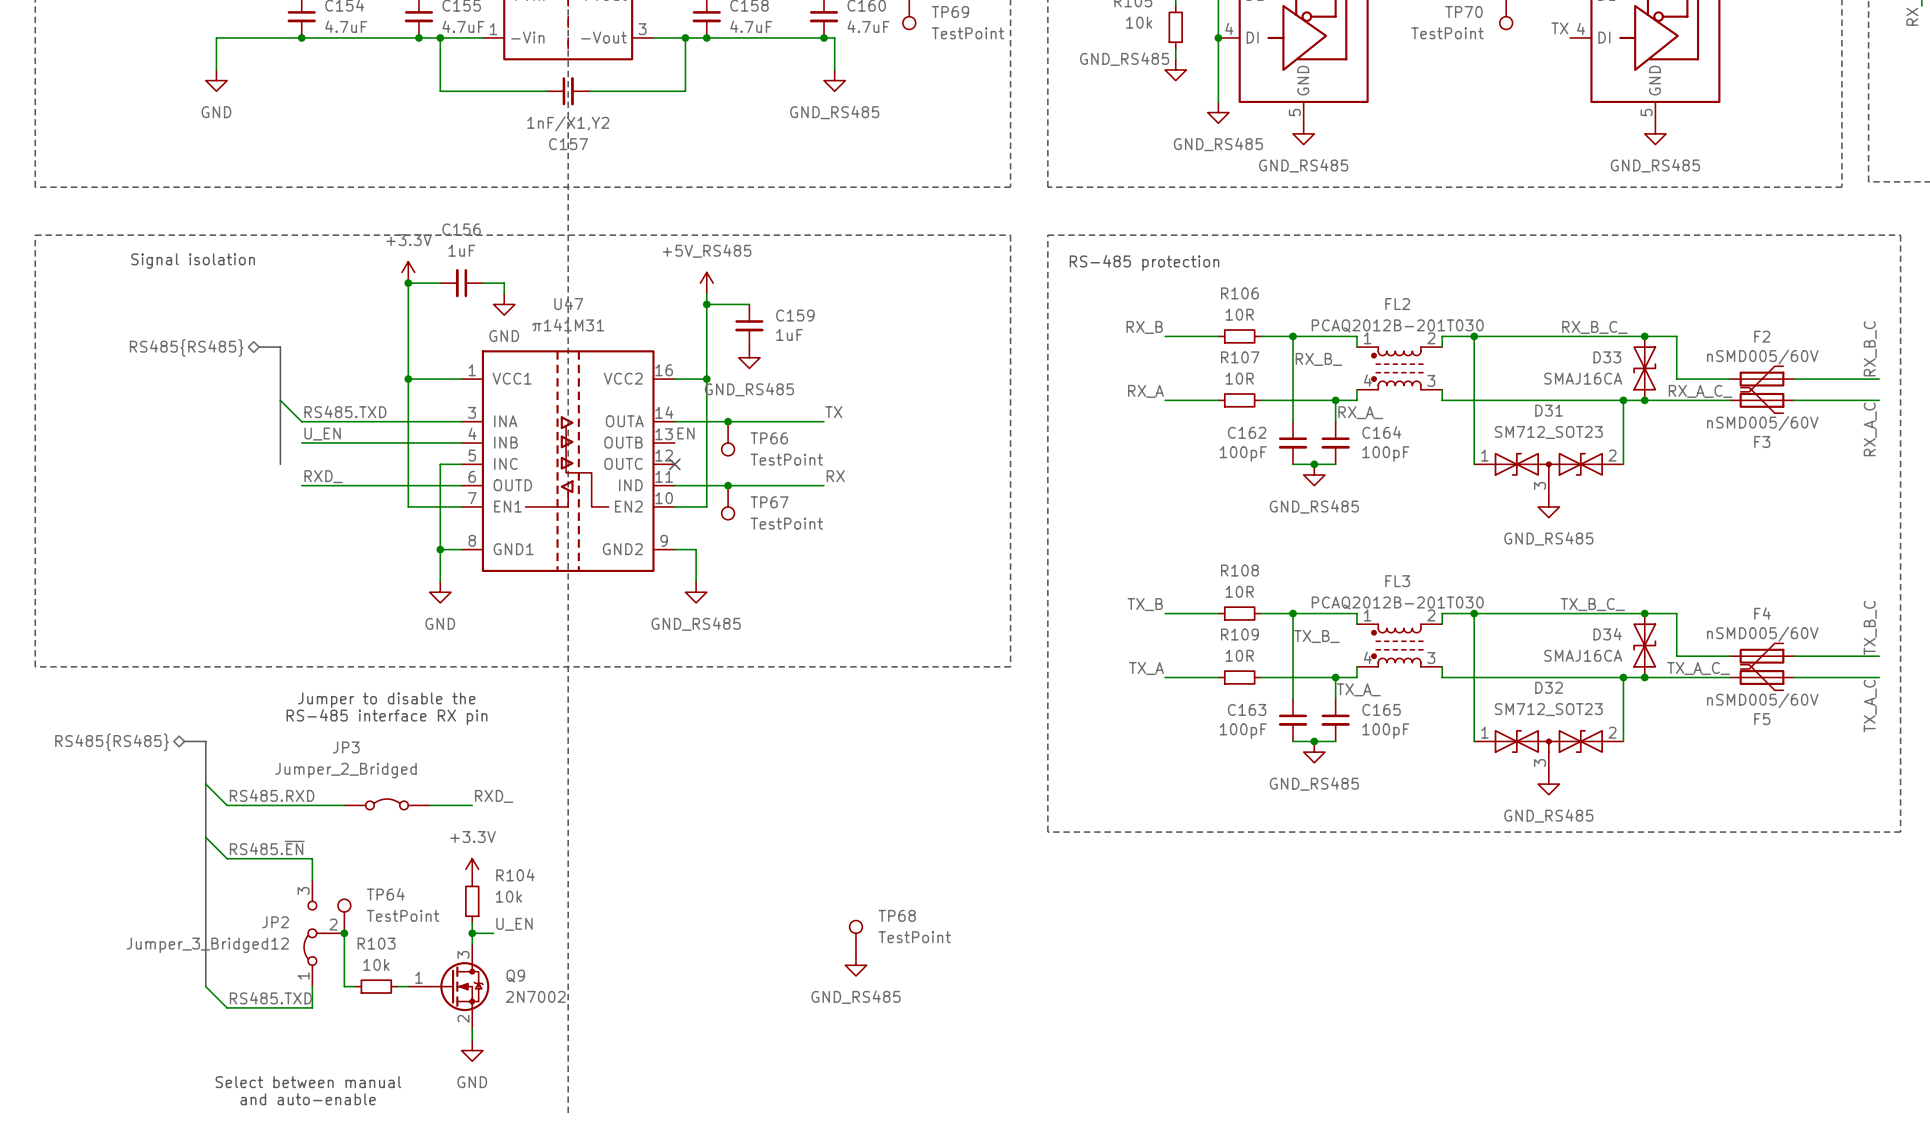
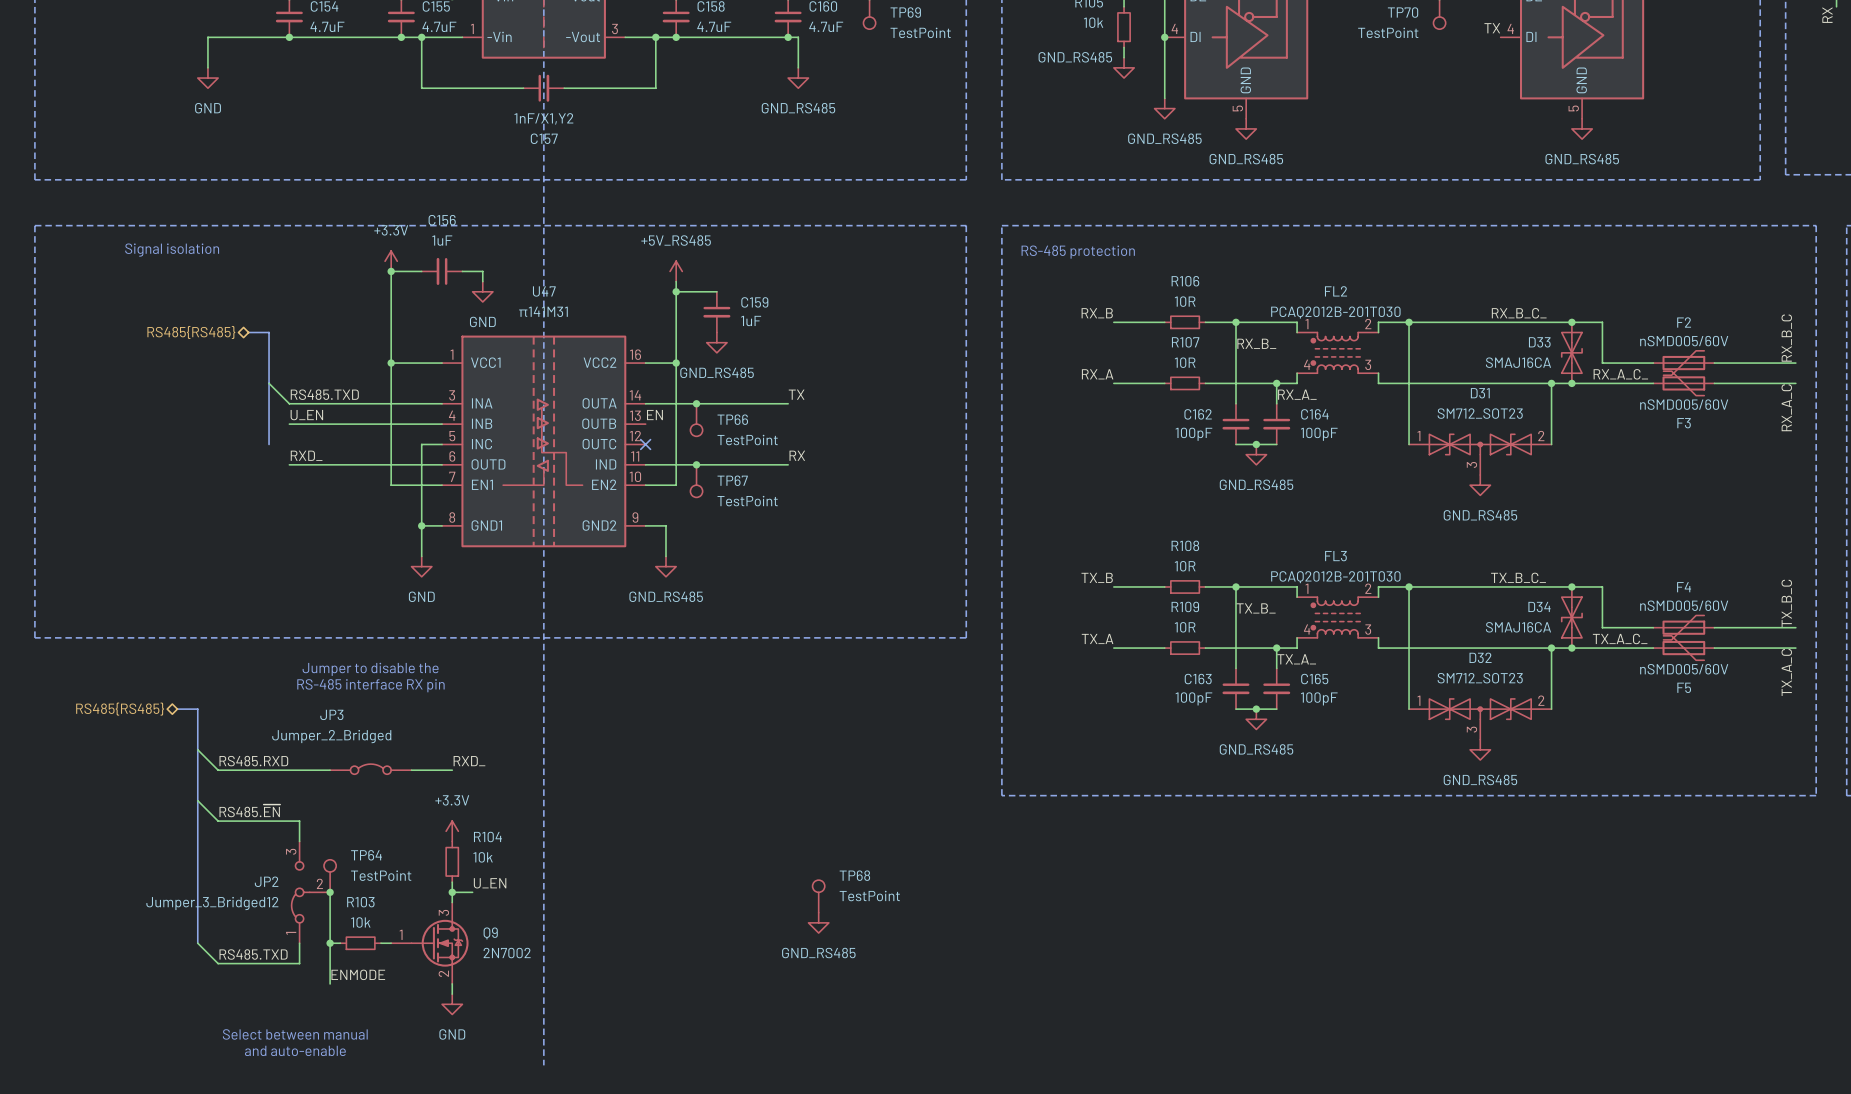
wire: none -> (330, 943) (330, 983)
junction: none -> (330, 943)
label: none -> ENMODE (358, 974)

